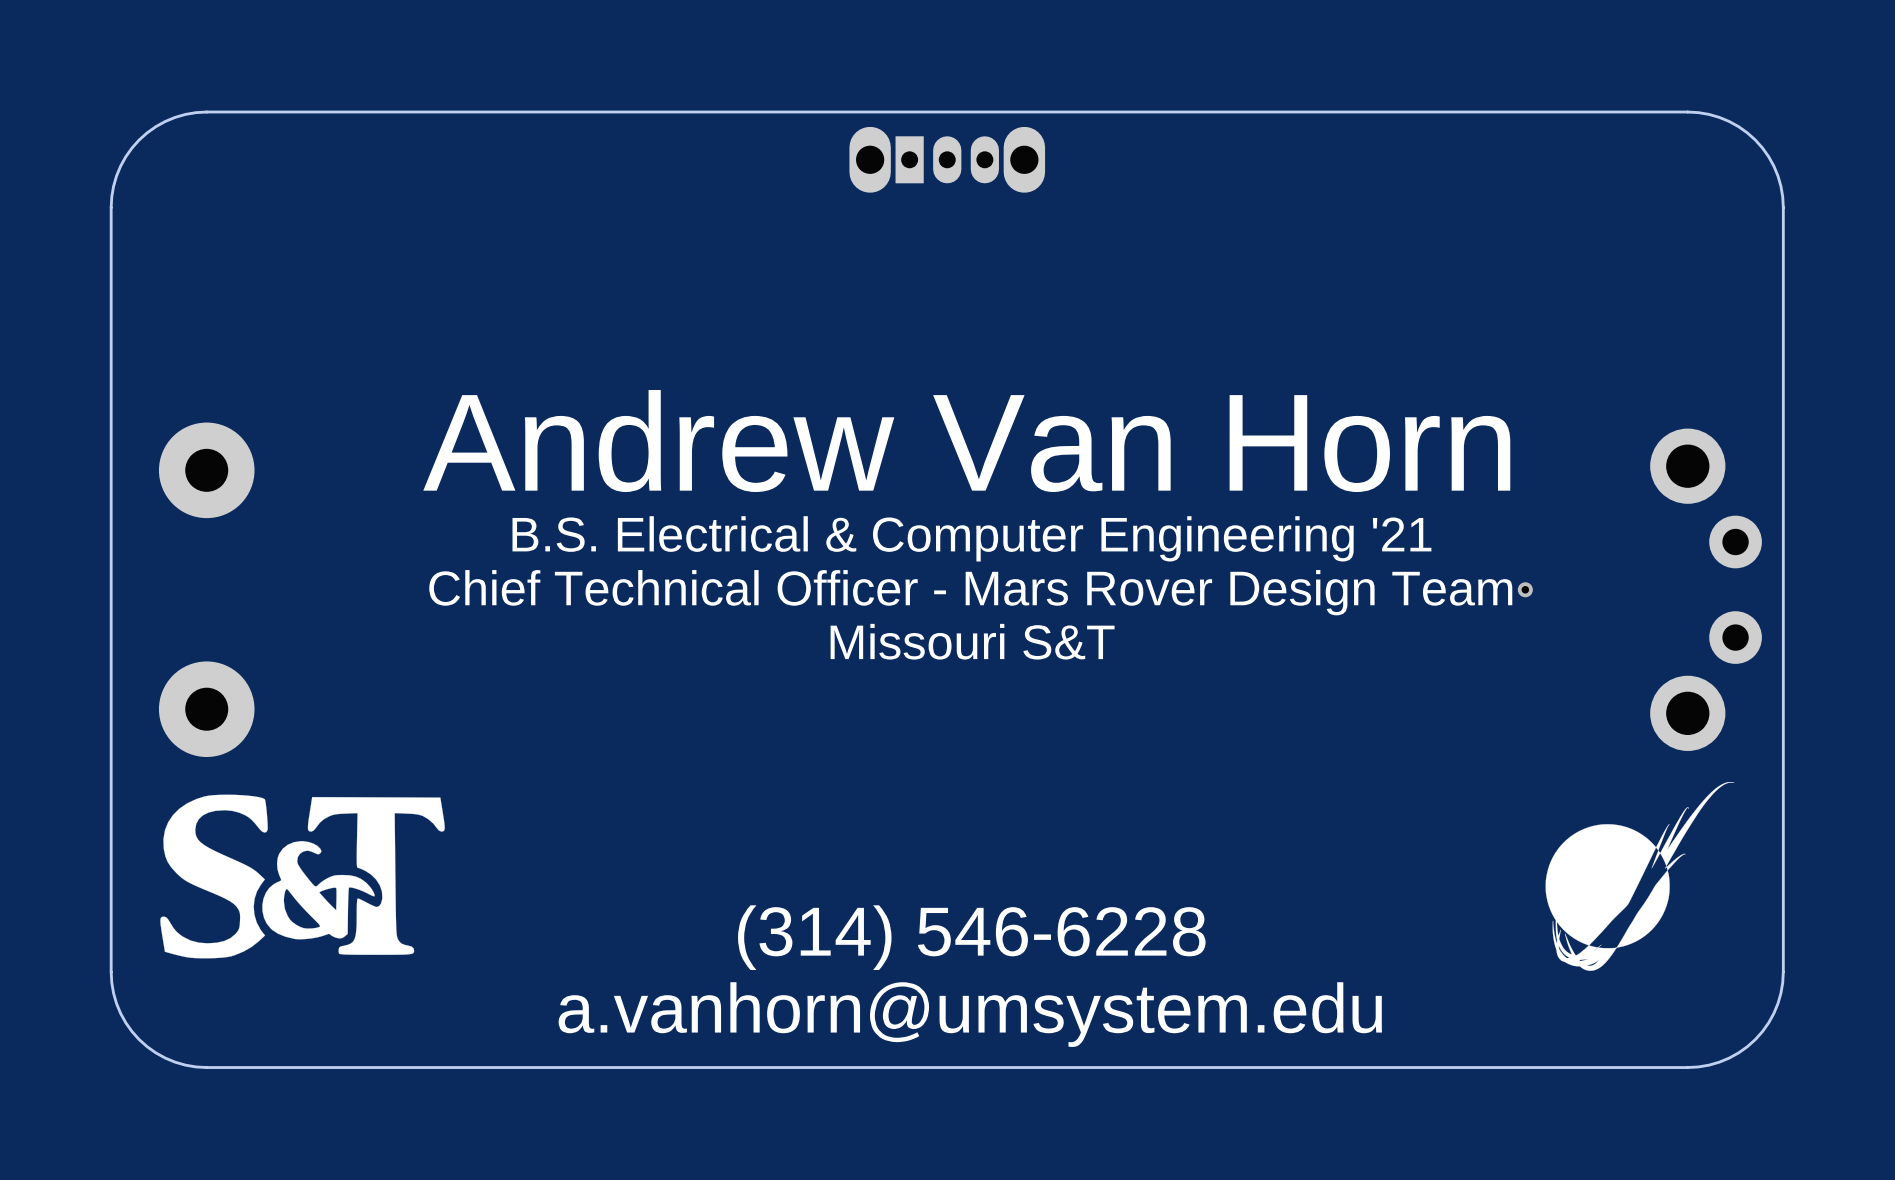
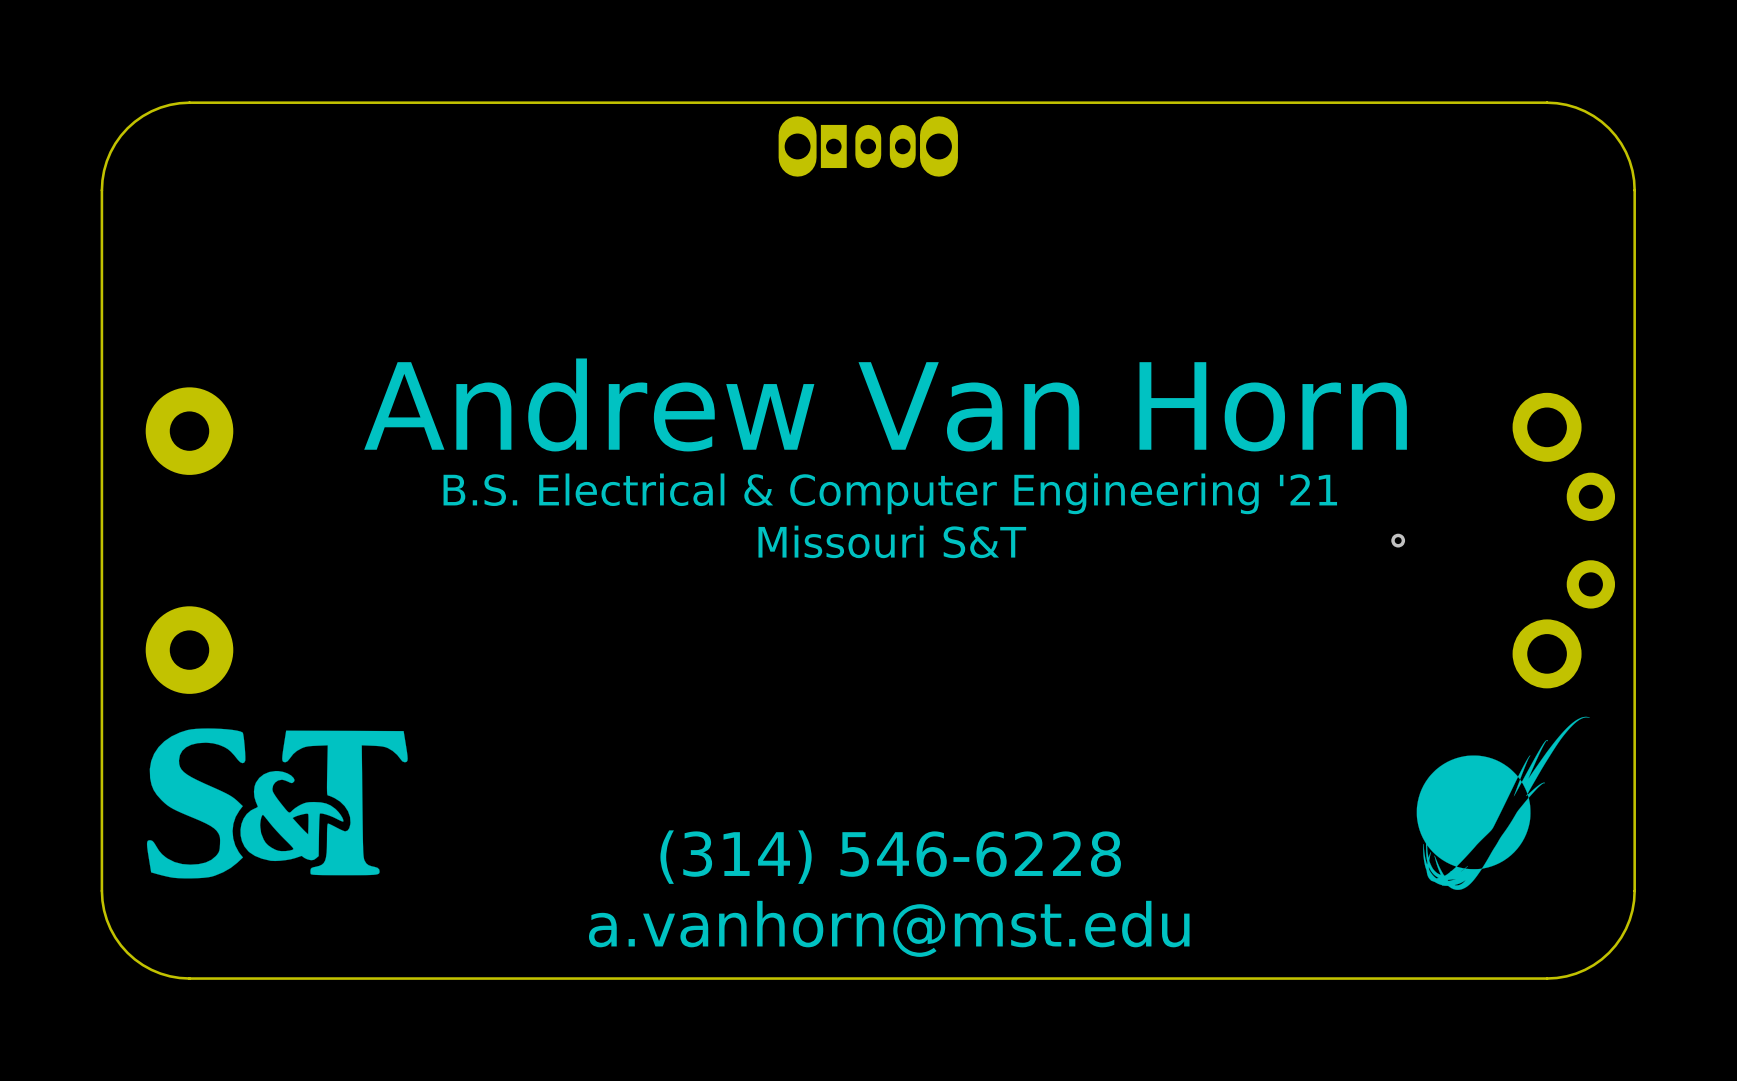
text: Chief Technical Officer - Mars Rover Design Team (970, 592) -> Missouri S&T (892, 541)
text: Missouri S&T (972, 641) -> none
text: a.vanhorn@umsystem.edu (970, 1014) -> a.vanhorn@mst.edu (889, 928)

